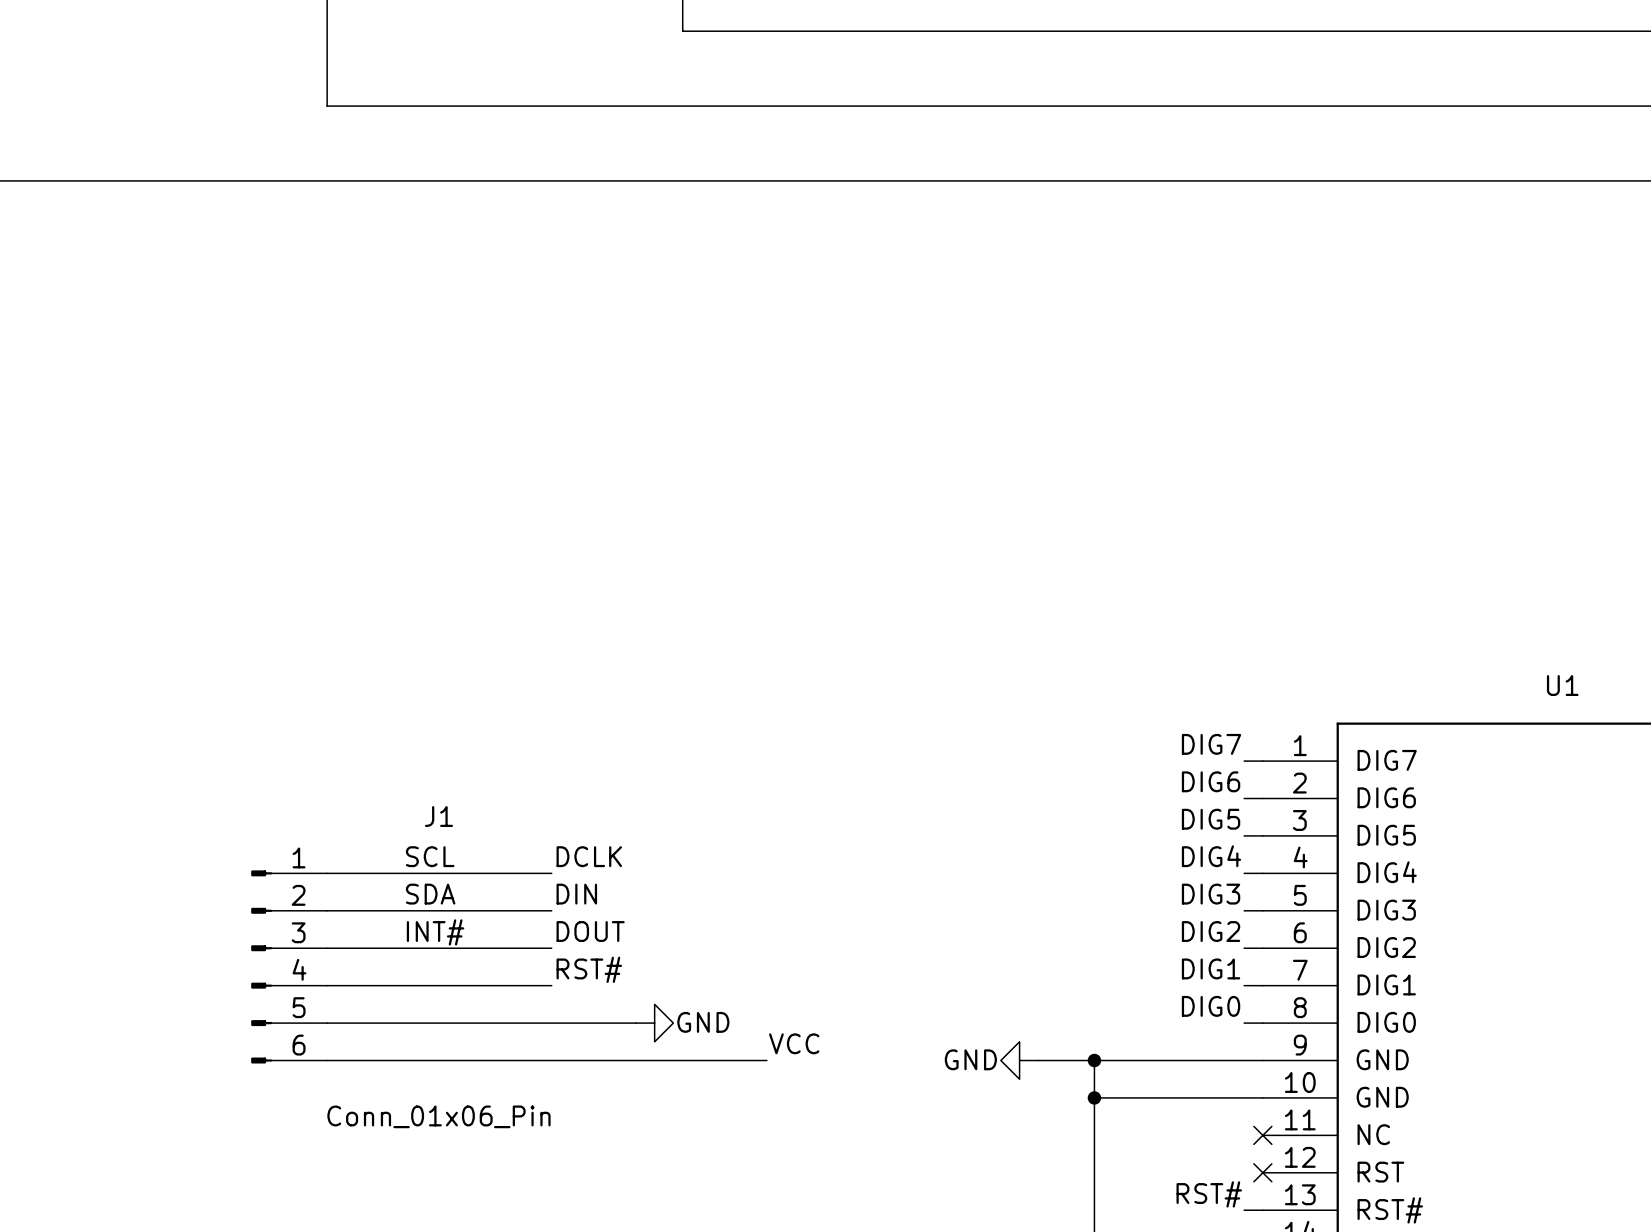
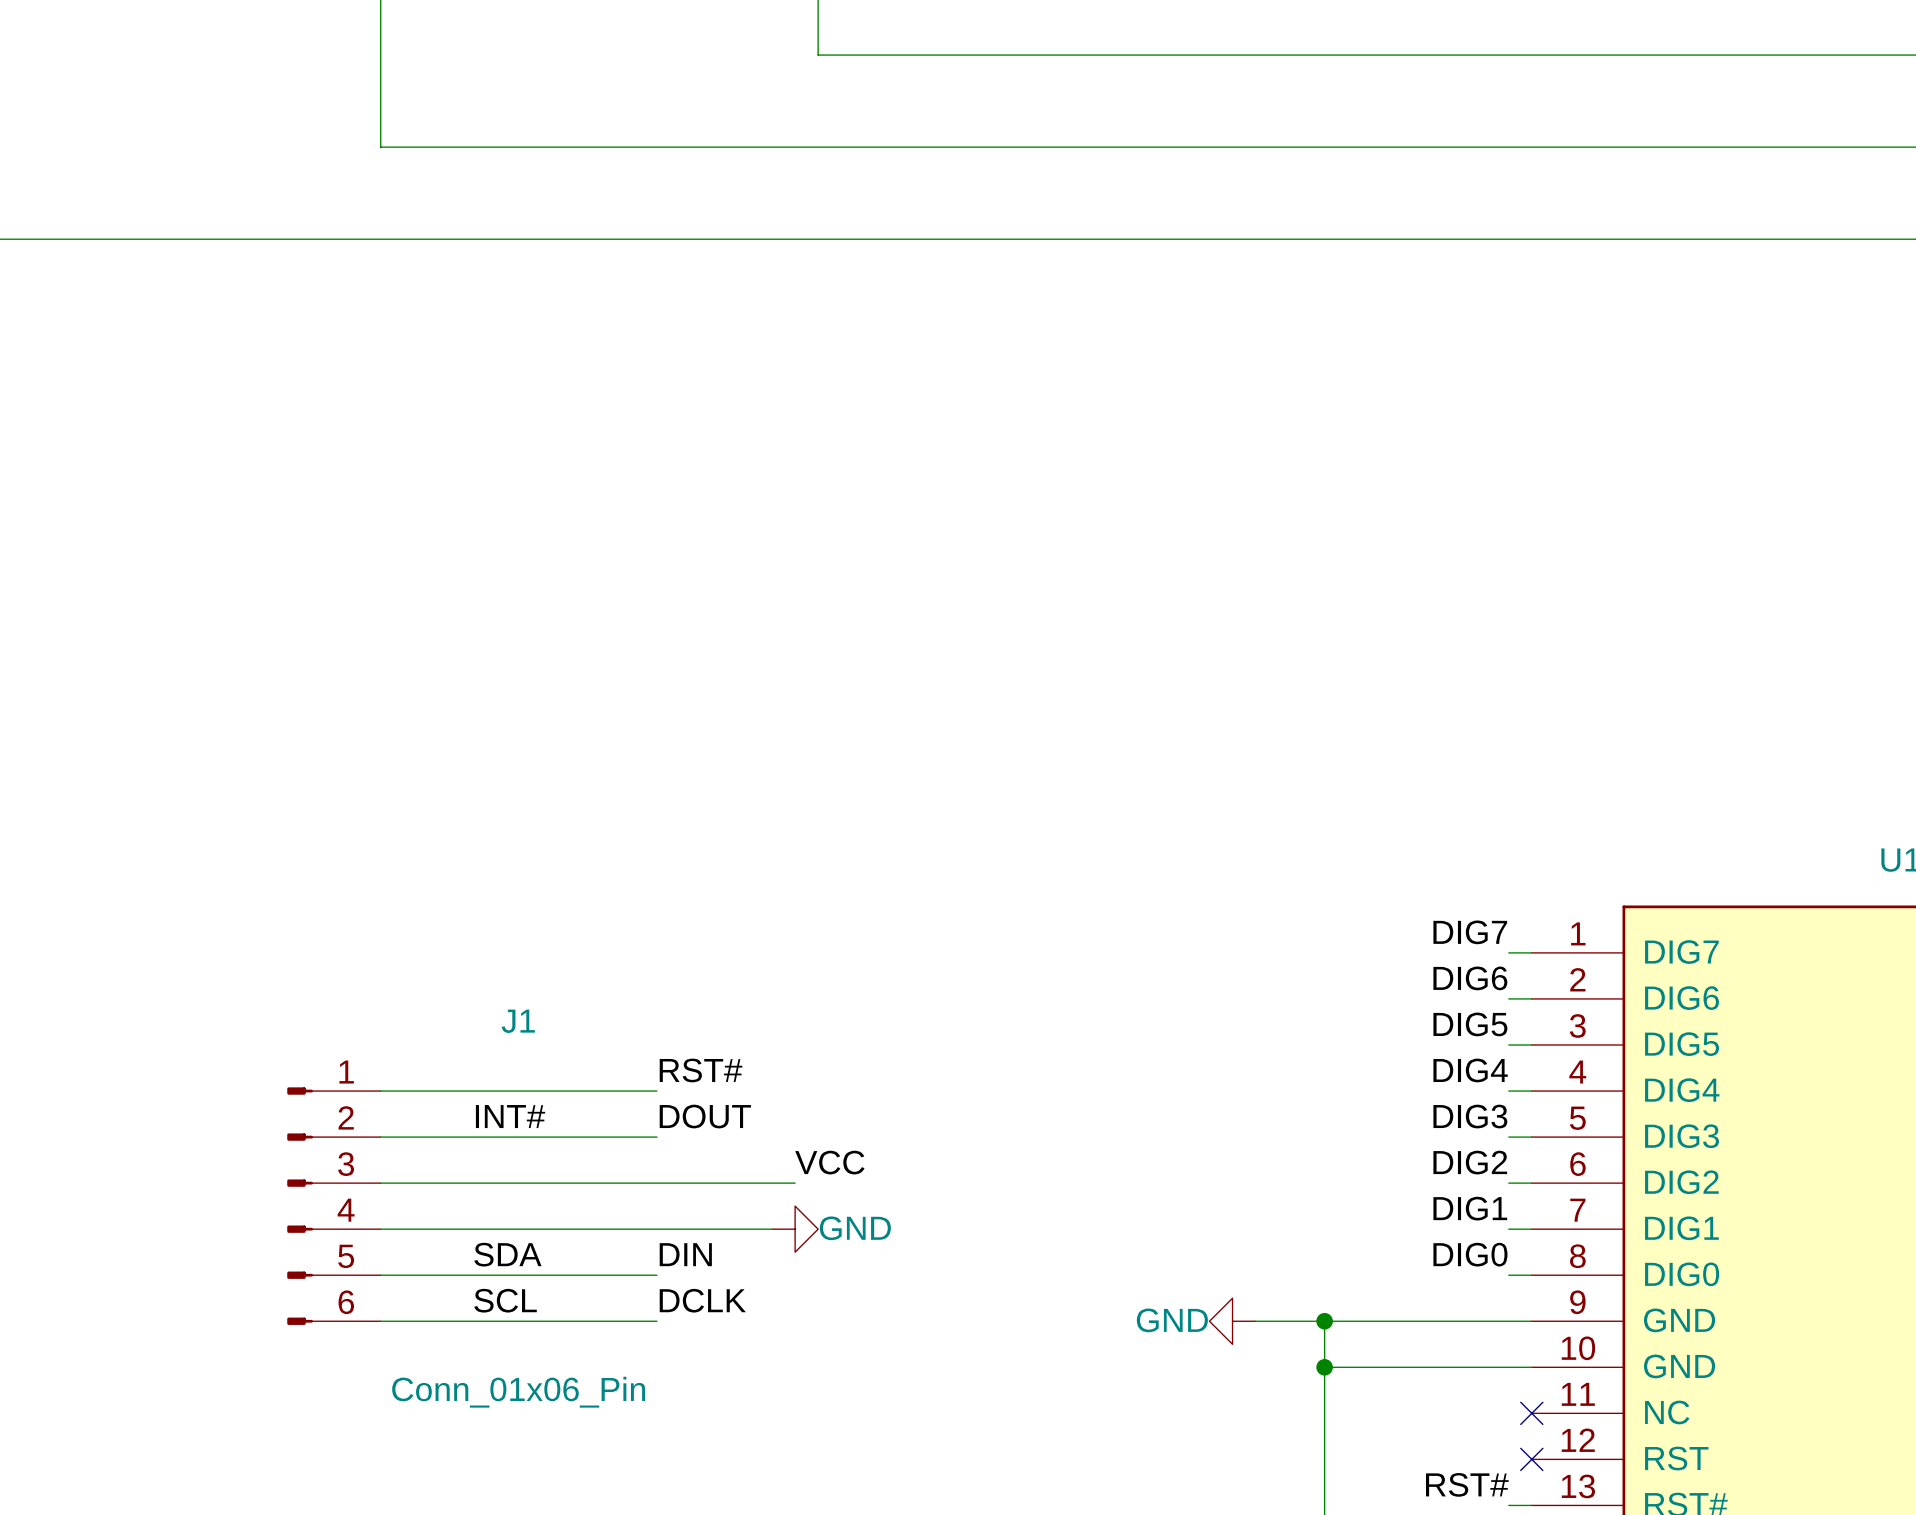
label position: SCL (430, 856) -> SCL (505, 1300)
label: DCLK (589, 856) -> RST# (701, 1070)
label: SDA (430, 894) -> INT# (510, 1116)
label: DIN (576, 894) -> DOUT (705, 1116)
label: DOUT (590, 931) -> none
label: INT# (435, 932) -> none
wire: none -> (656, 1183) (795, 1183)
label: RST# (589, 969) -> none
wire: none -> (656, 1229) (772, 1229)
label: none -> SDA (507, 1254)
label: none -> DIN (685, 1254)
wire: (551, 1023) (635, 1023) -> none
power symbol position: GND (654, 1023) -> GND (795, 1229)
label: none -> DCLK (702, 1300)
label position: VCC (794, 1043) -> VCC (829, 1162)
wire: (551, 1060) (766, 1060) -> none

